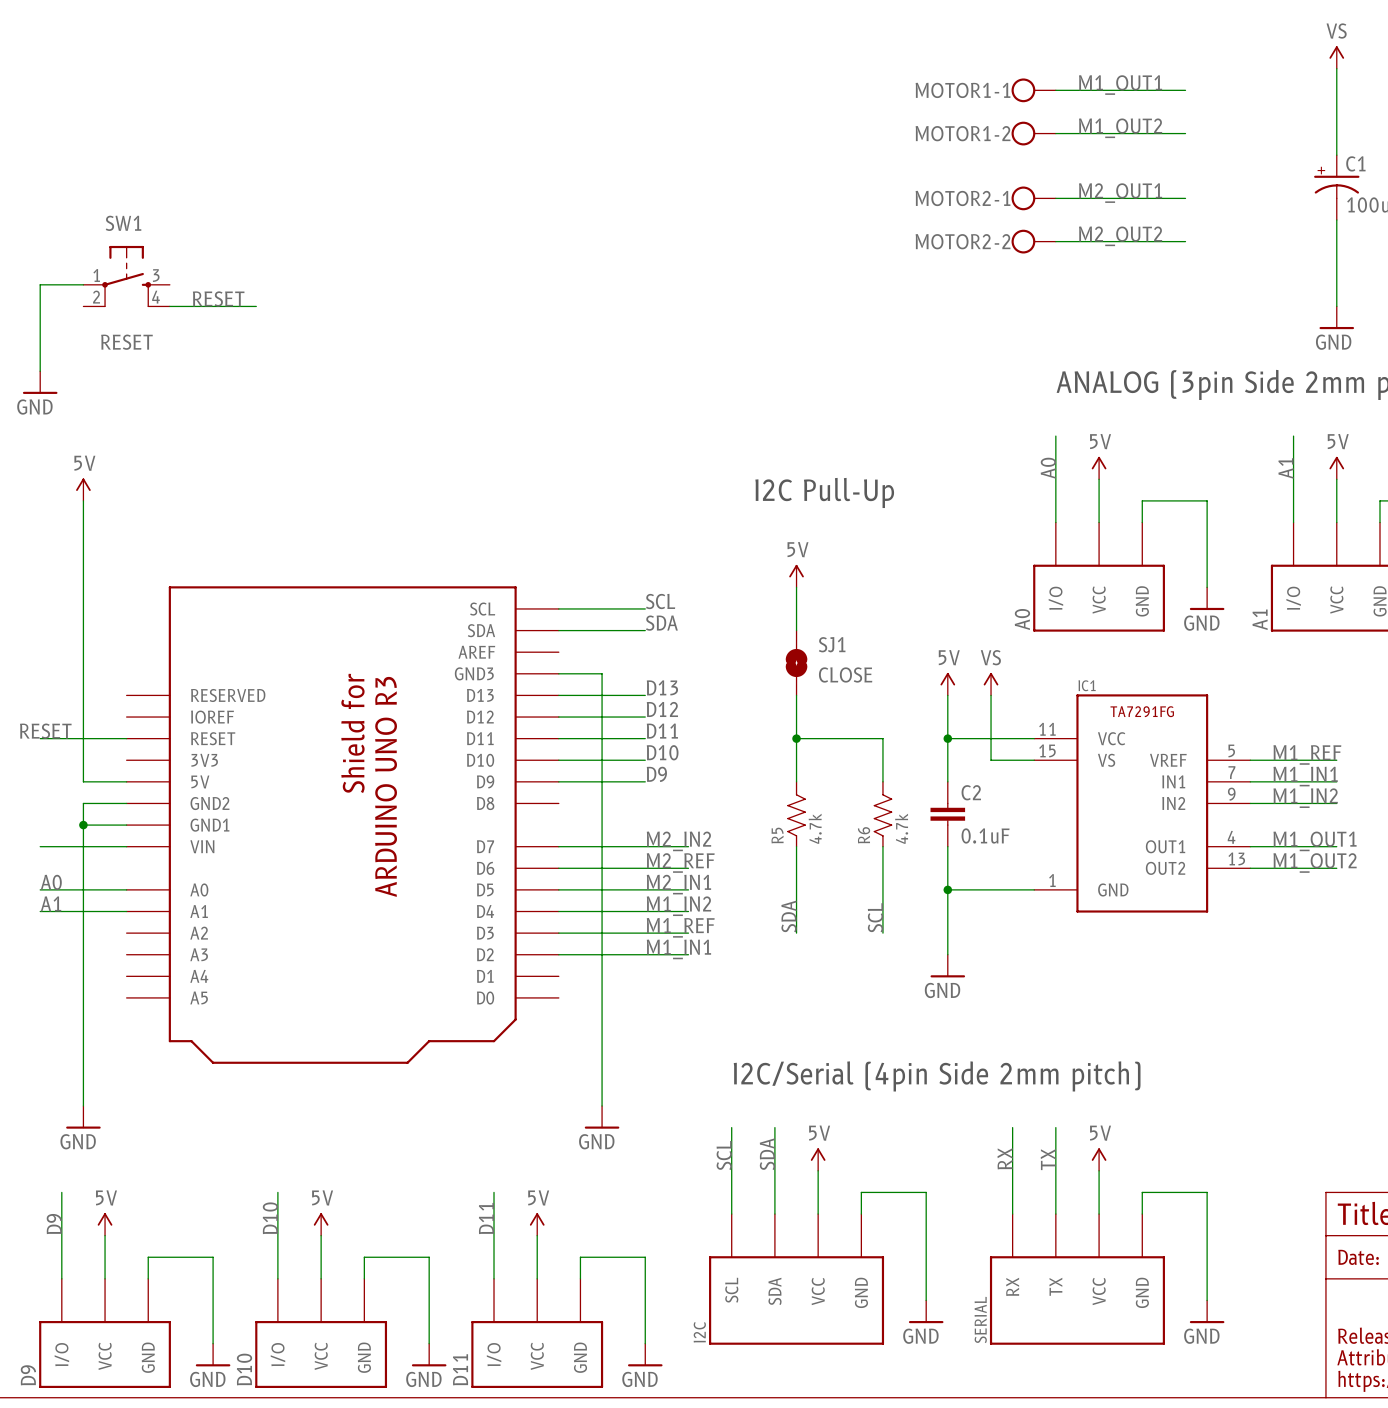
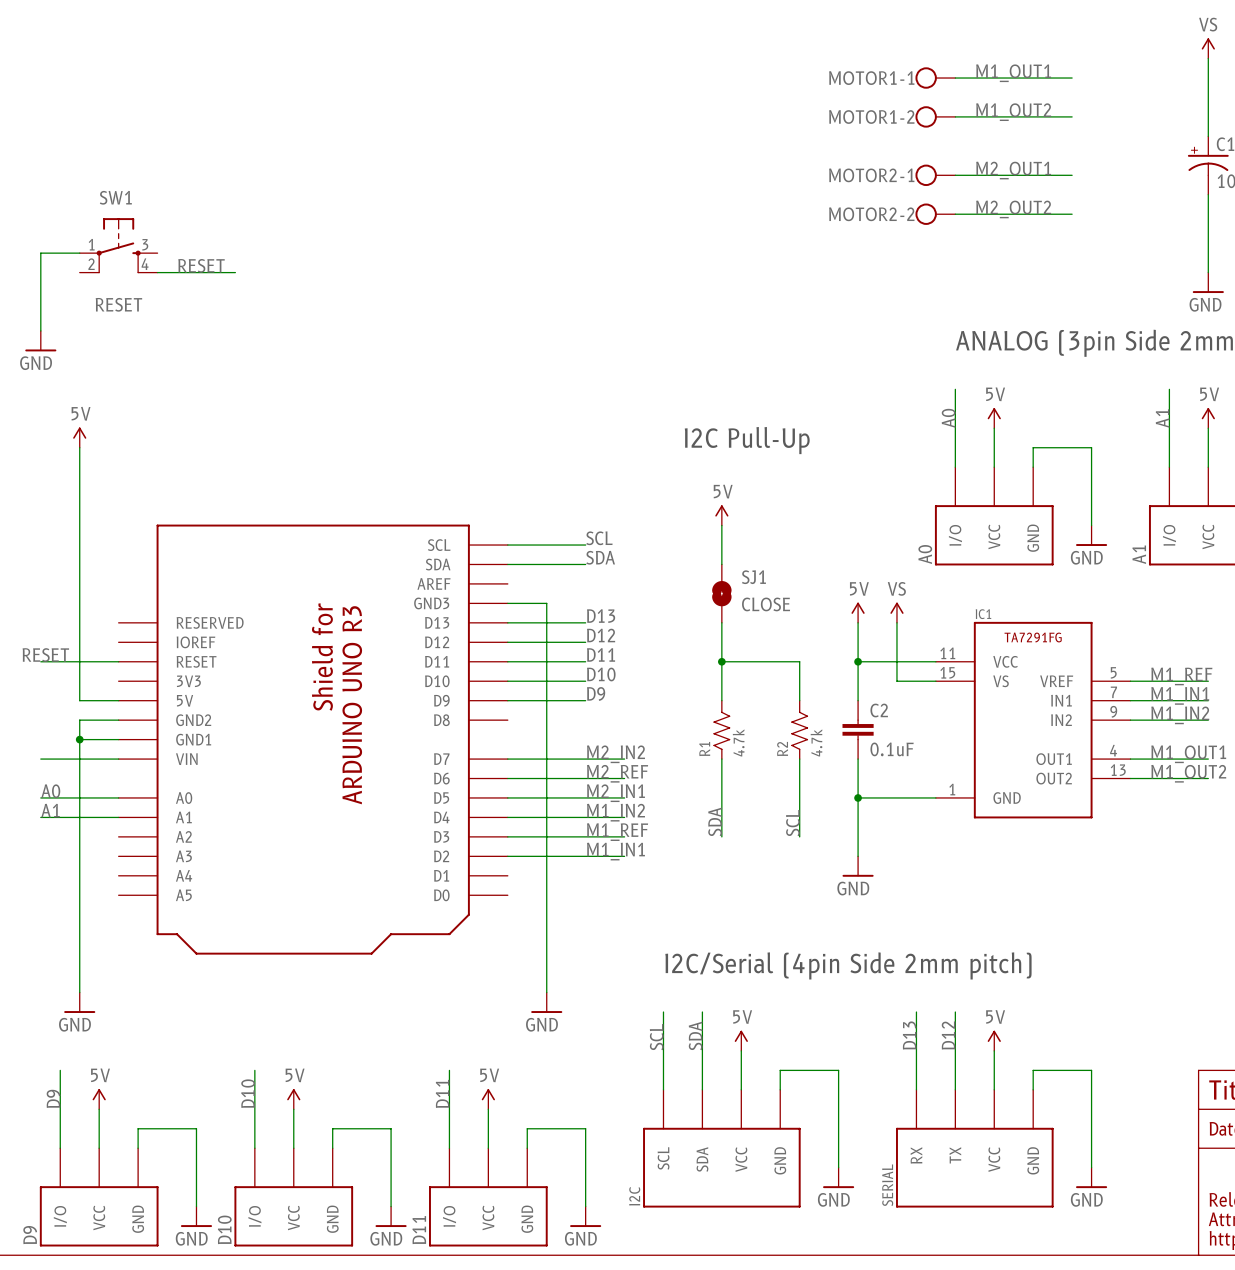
R5 name: R5 (777, 835) -> R1 (704, 749)
R6 name: R6 (864, 835) -> R2 (782, 749)
label: RX (1005, 1158) -> D13 (909, 1035)
label: TX (1048, 1159) -> D12 (948, 1035)

